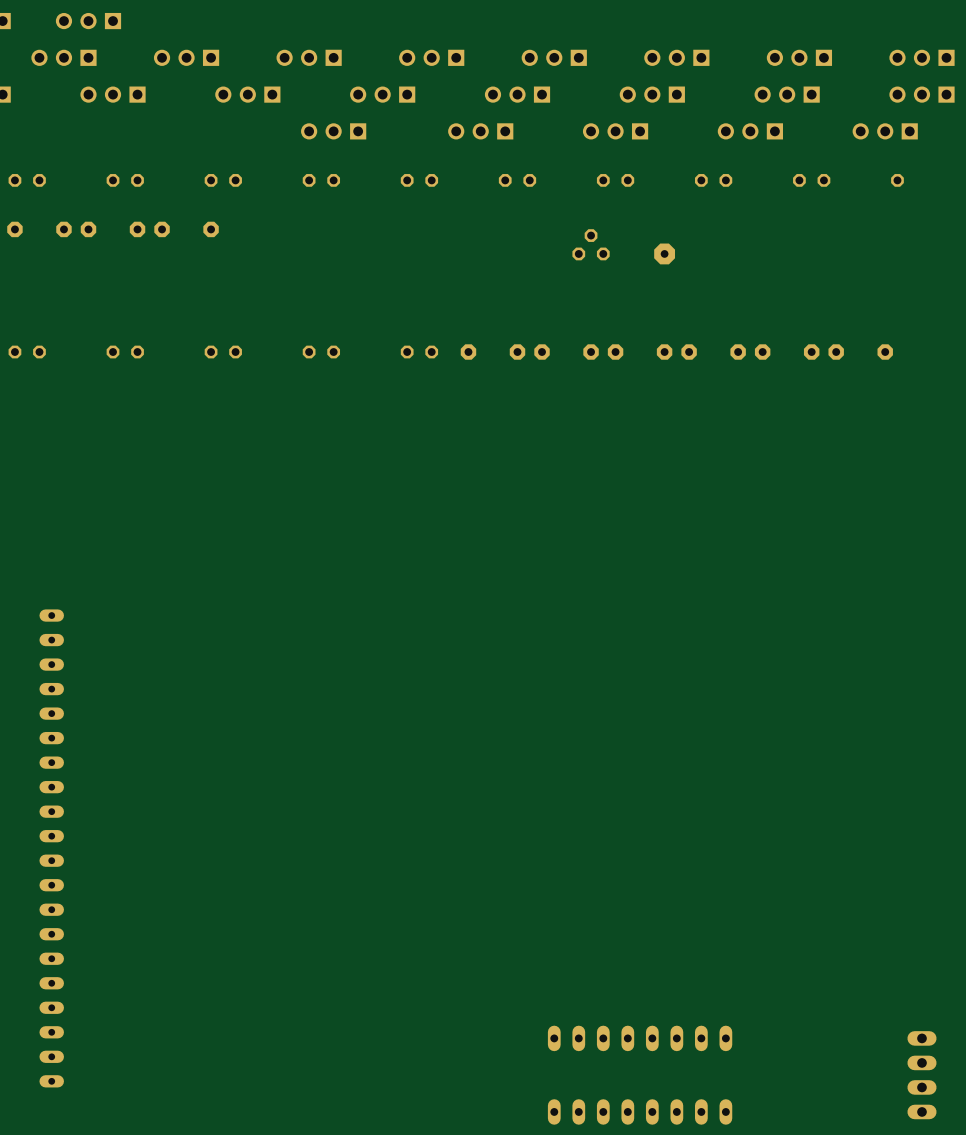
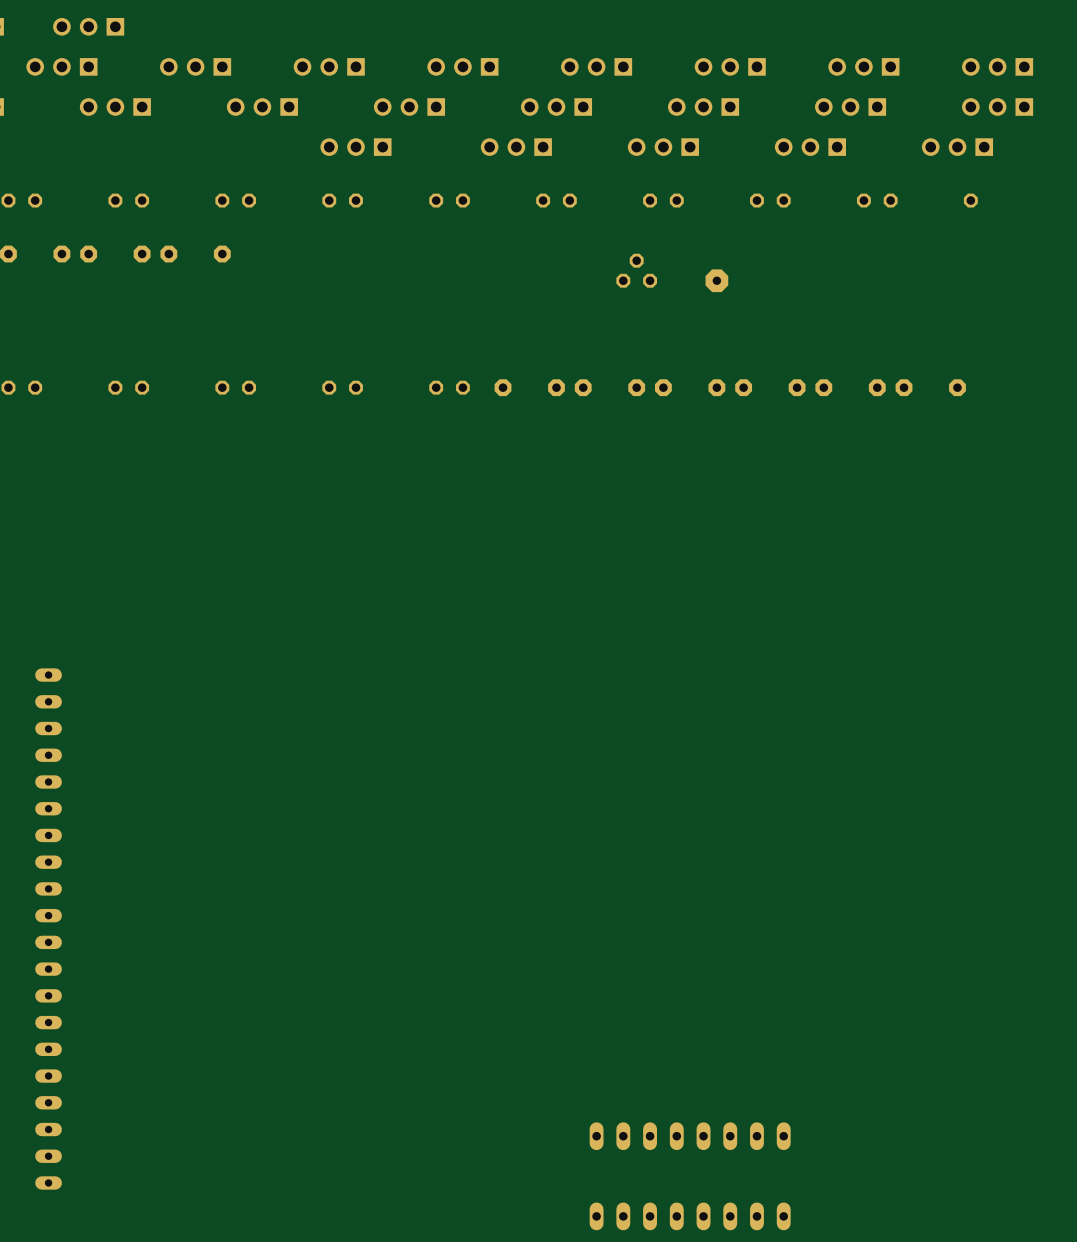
part: (921, 1075) -> none

